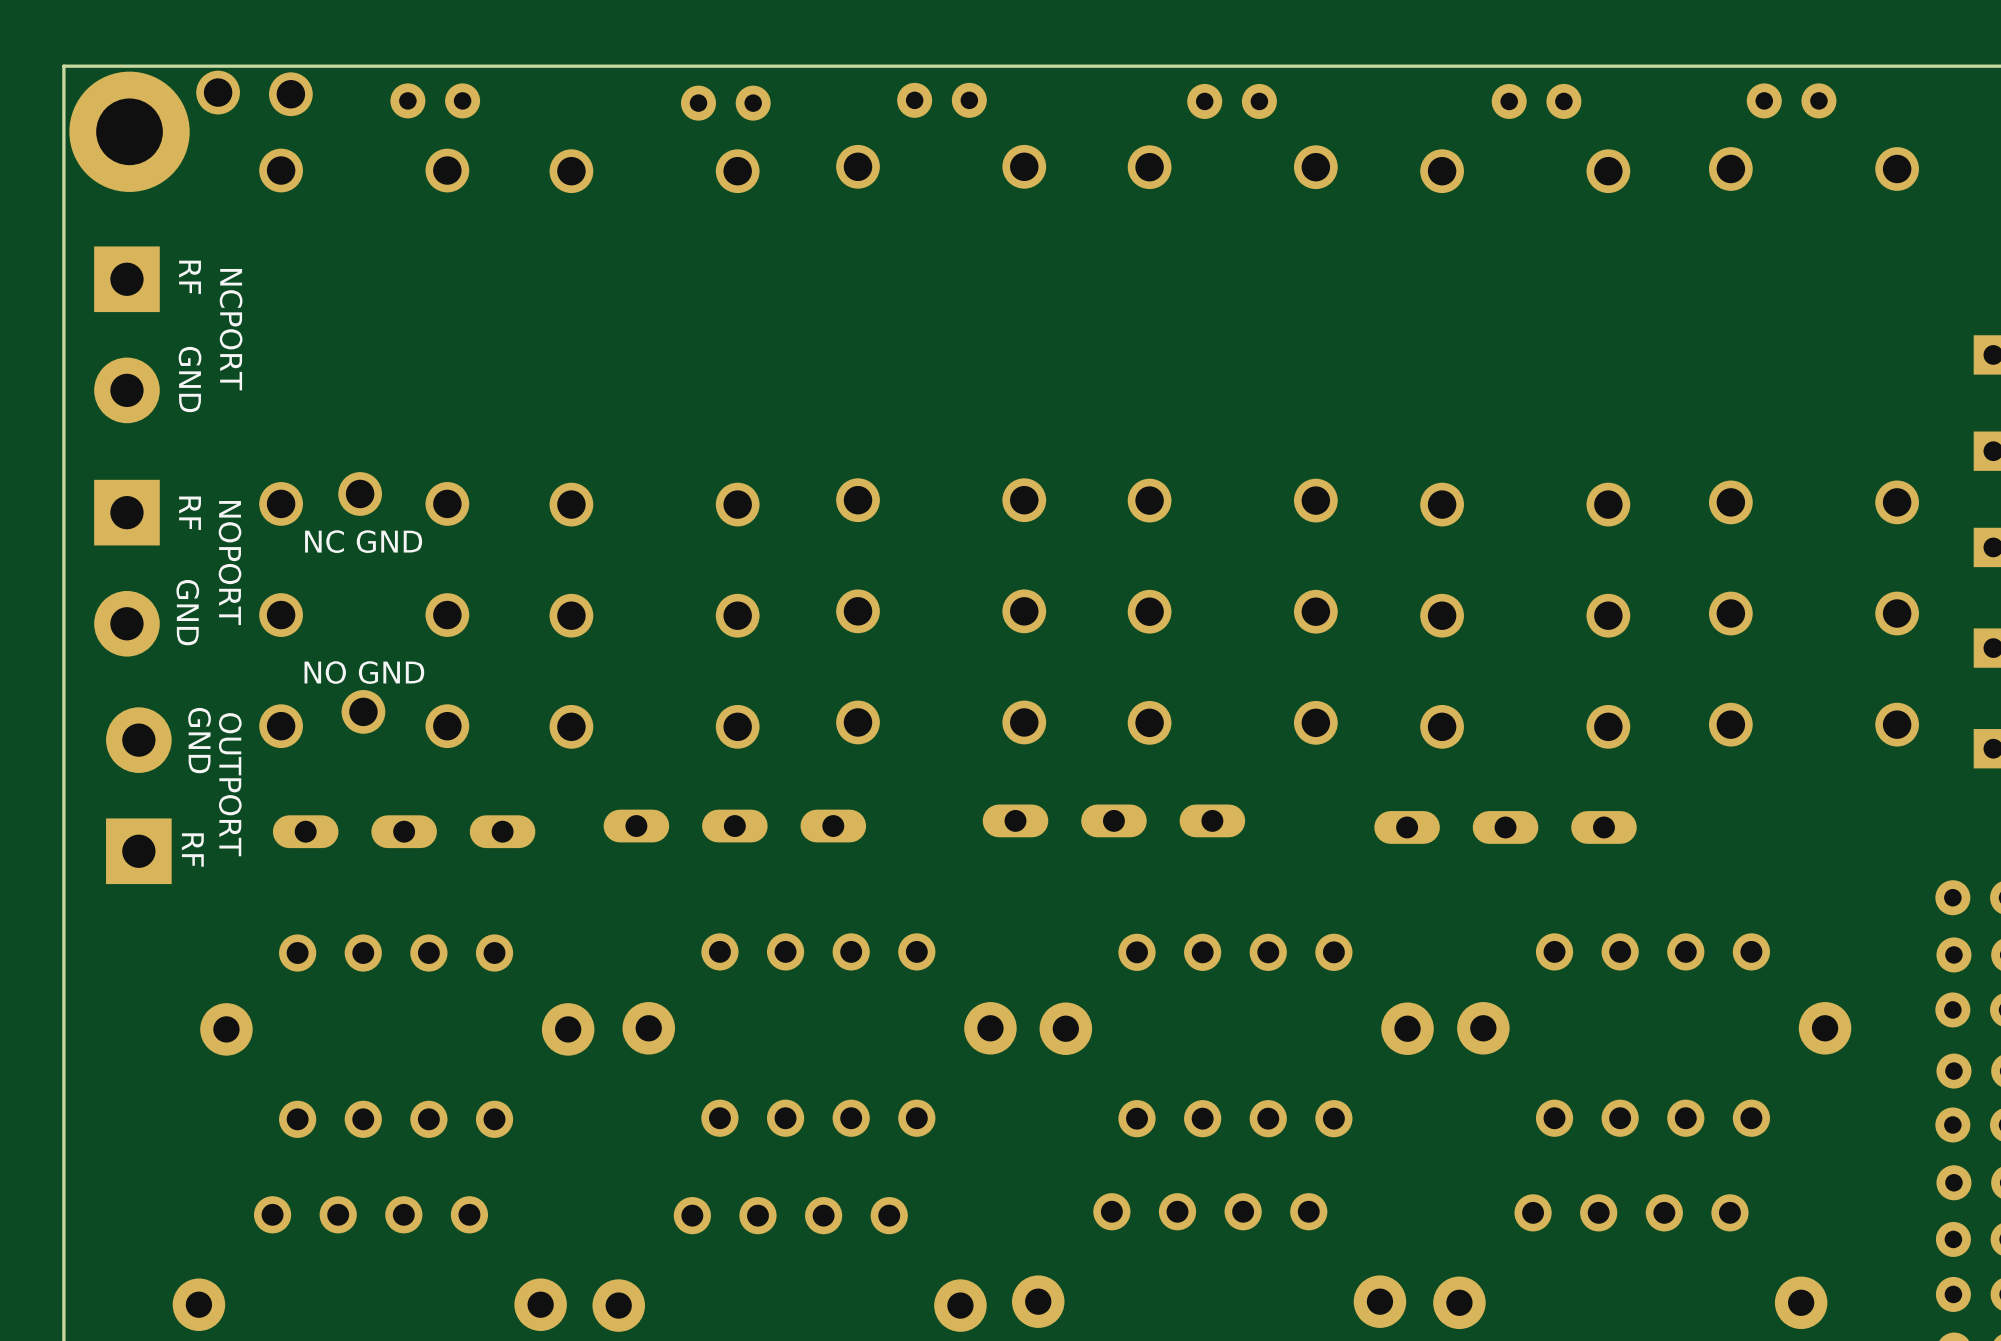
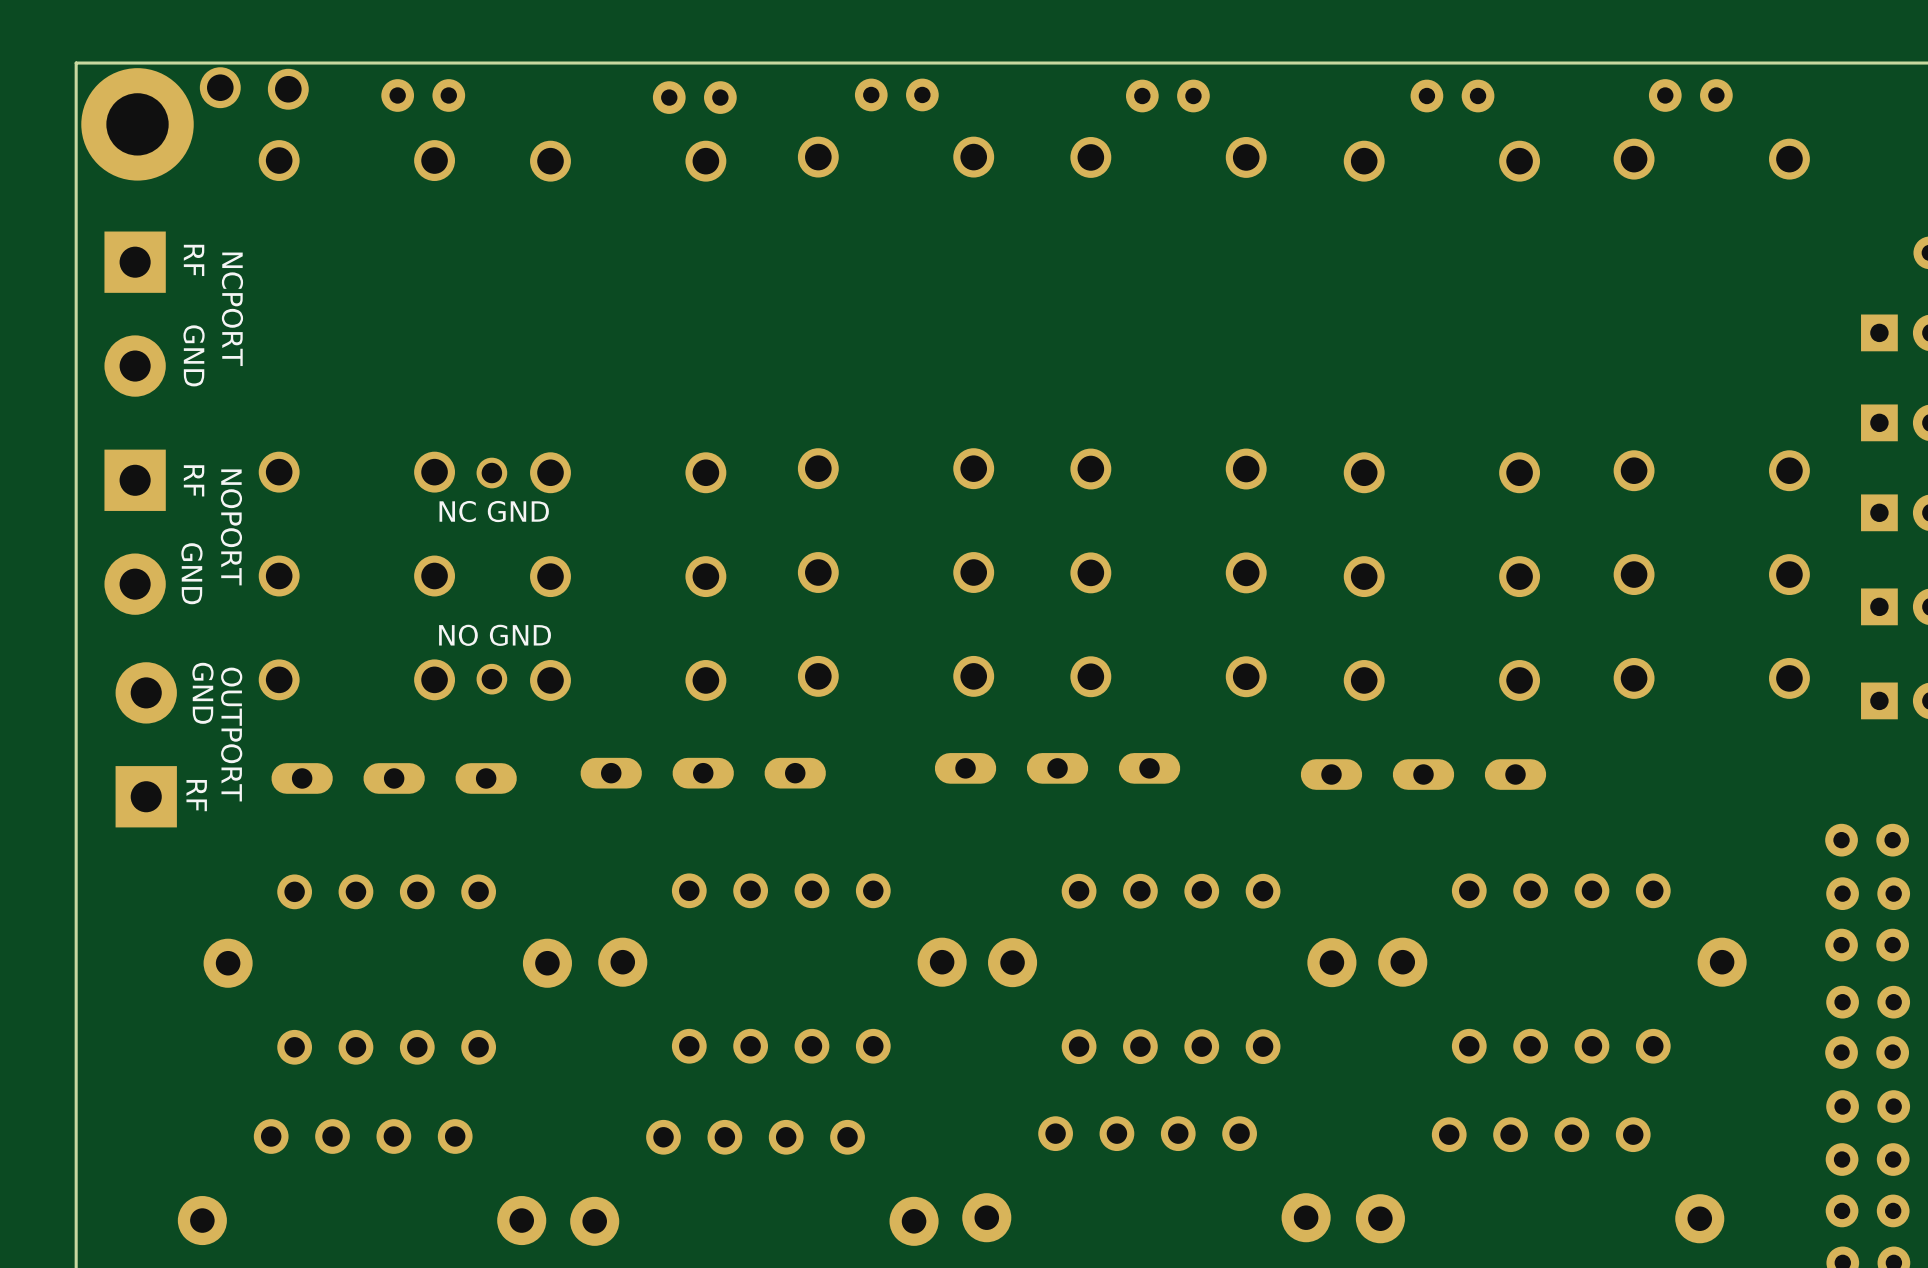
part: (360, 493) -> none
part: none -> (491, 473)
text position: NC GND (363, 541) -> NC GND (494, 511)
text position: NO GND (364, 672) -> NO GND (495, 635)
part: (363, 711) -> none
part: none -> (491, 679)

